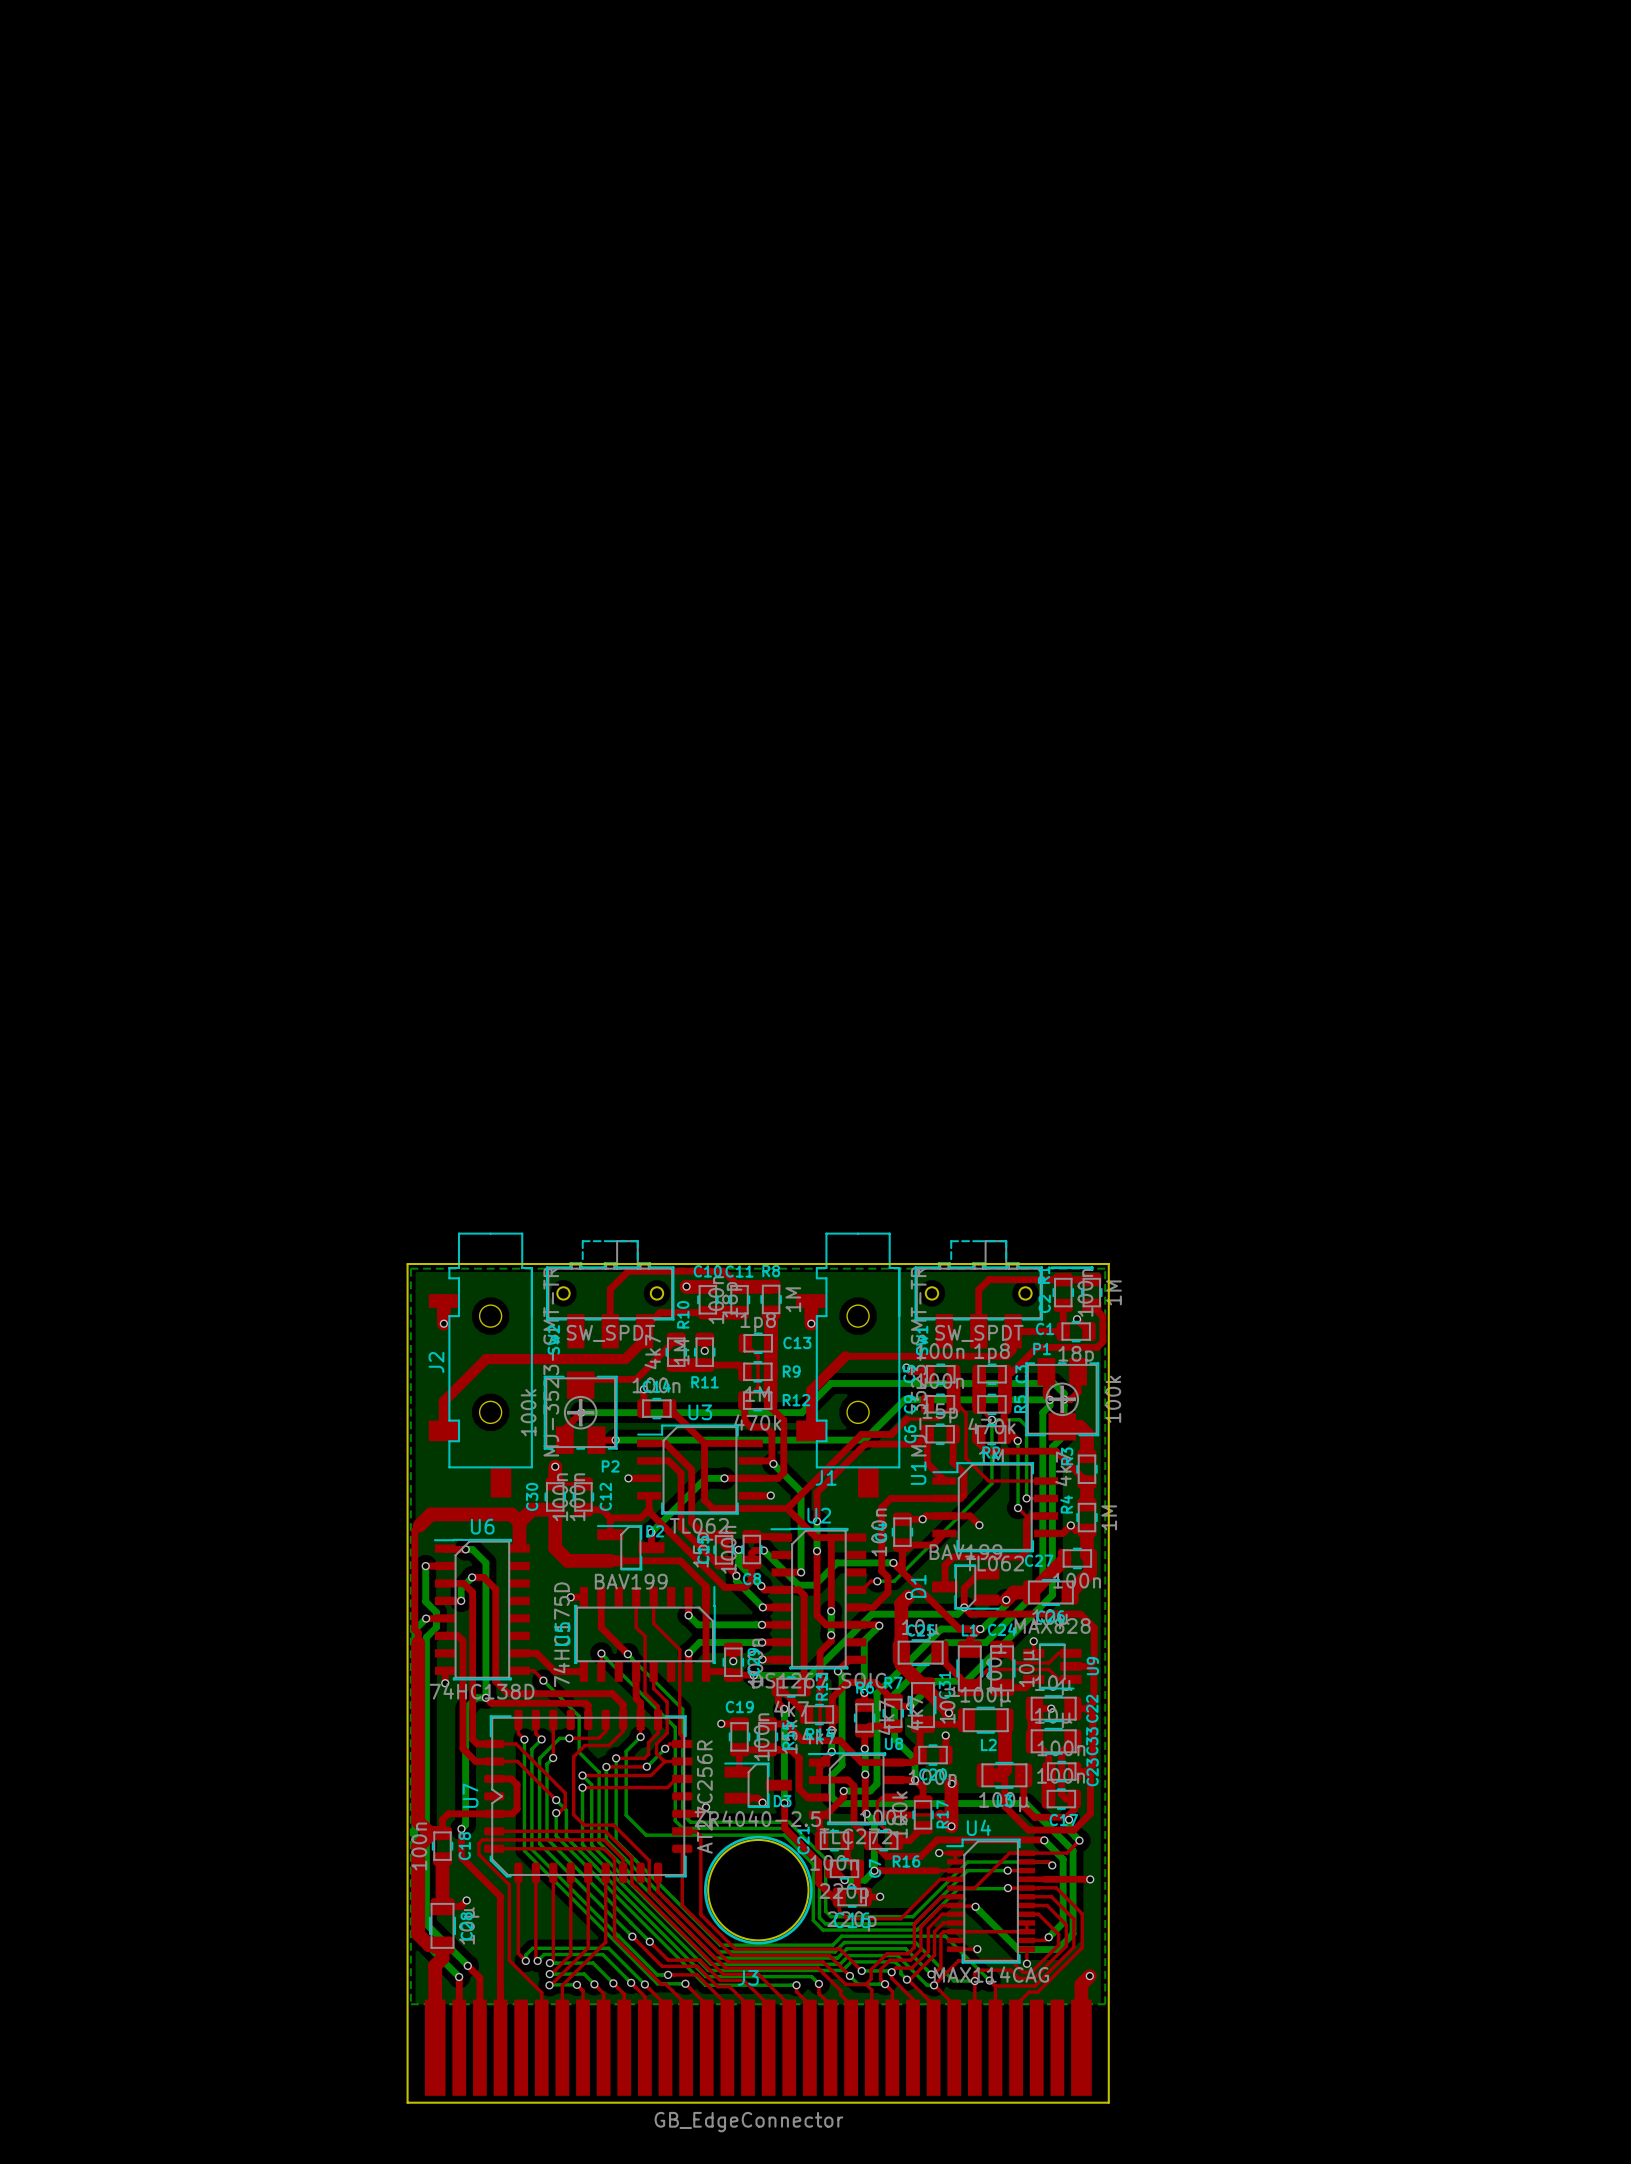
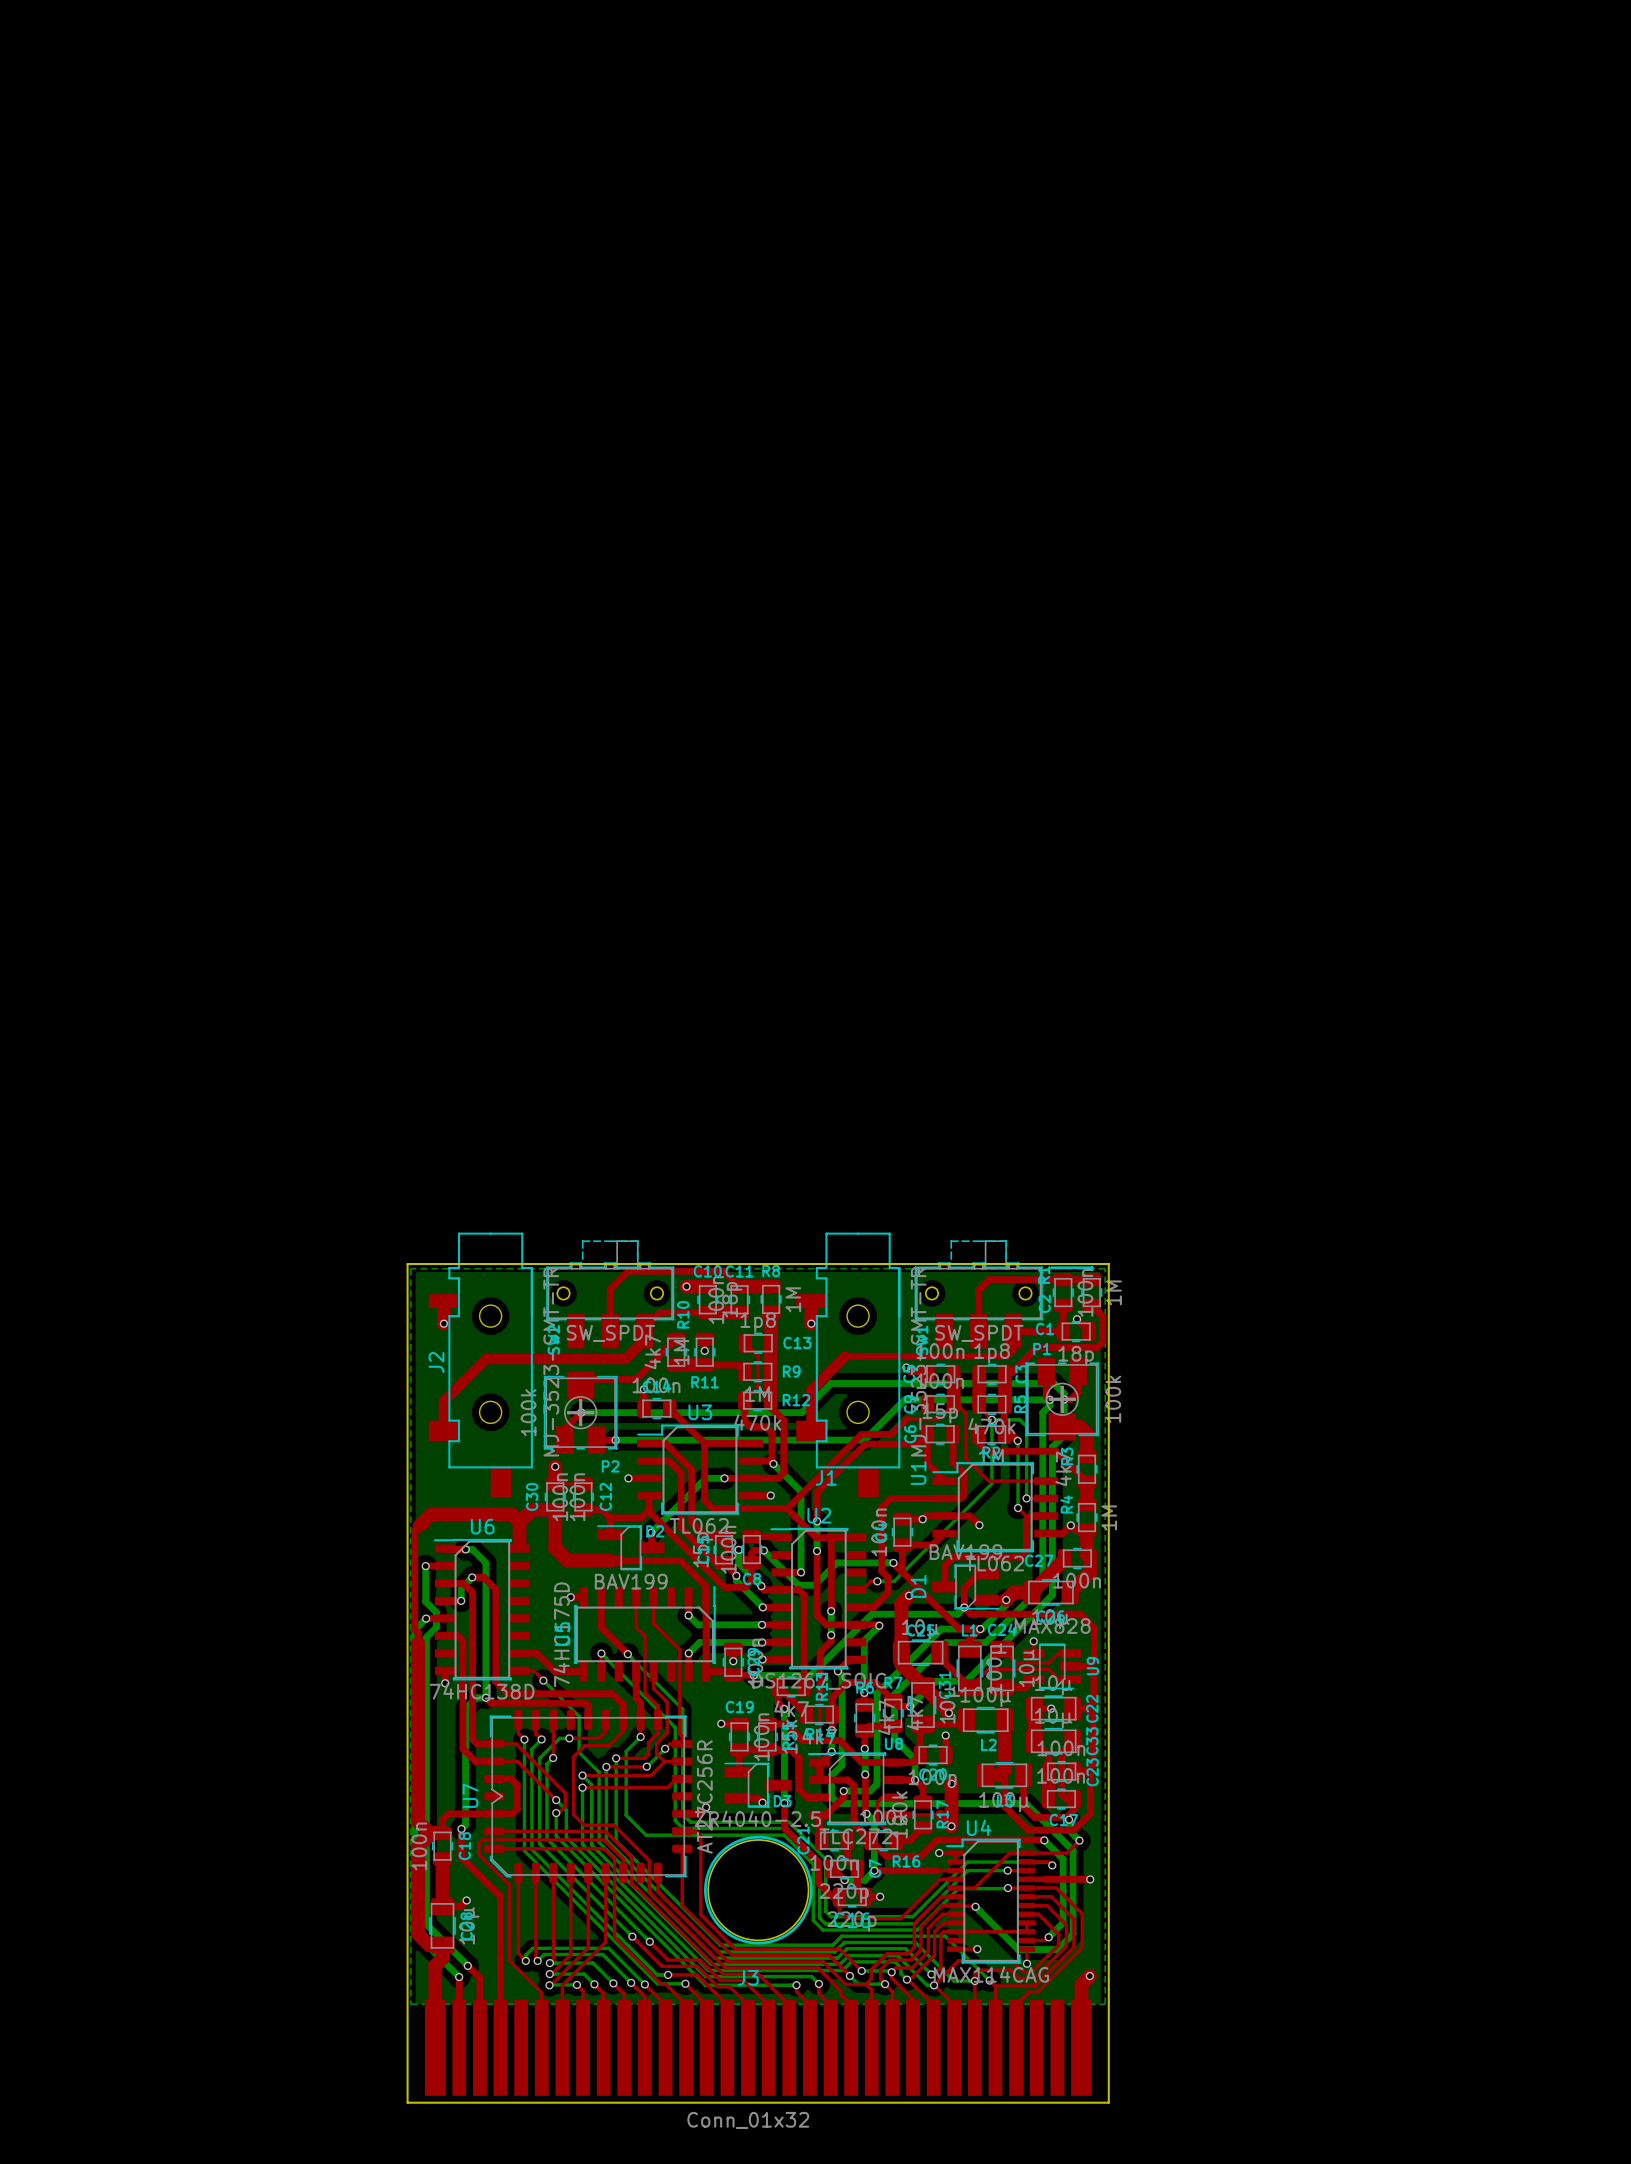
J3 value: GB_EdgeConnector (748, 2122) -> Conn_01x32 (748, 2120)

